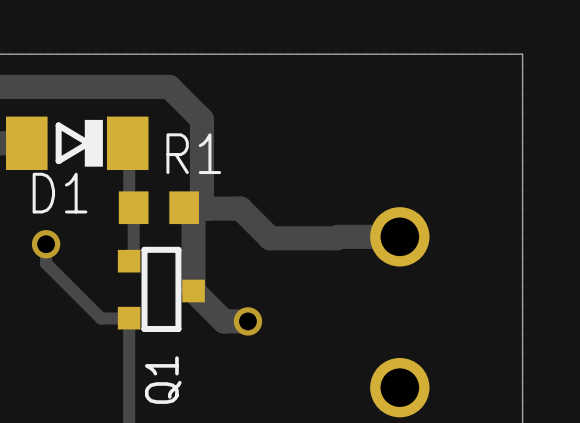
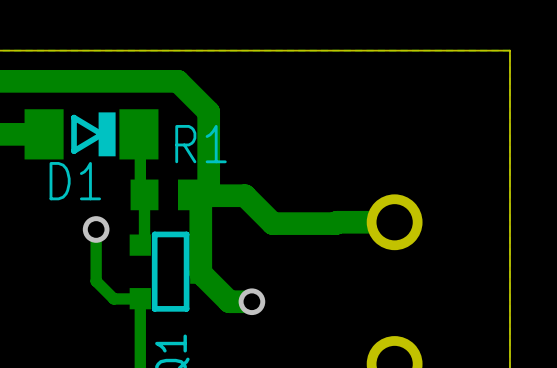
track: (46, 244) (46, 263) (82, 299) -> (96, 229) (96, 281)
via position: (46, 244) -> (96, 229)

